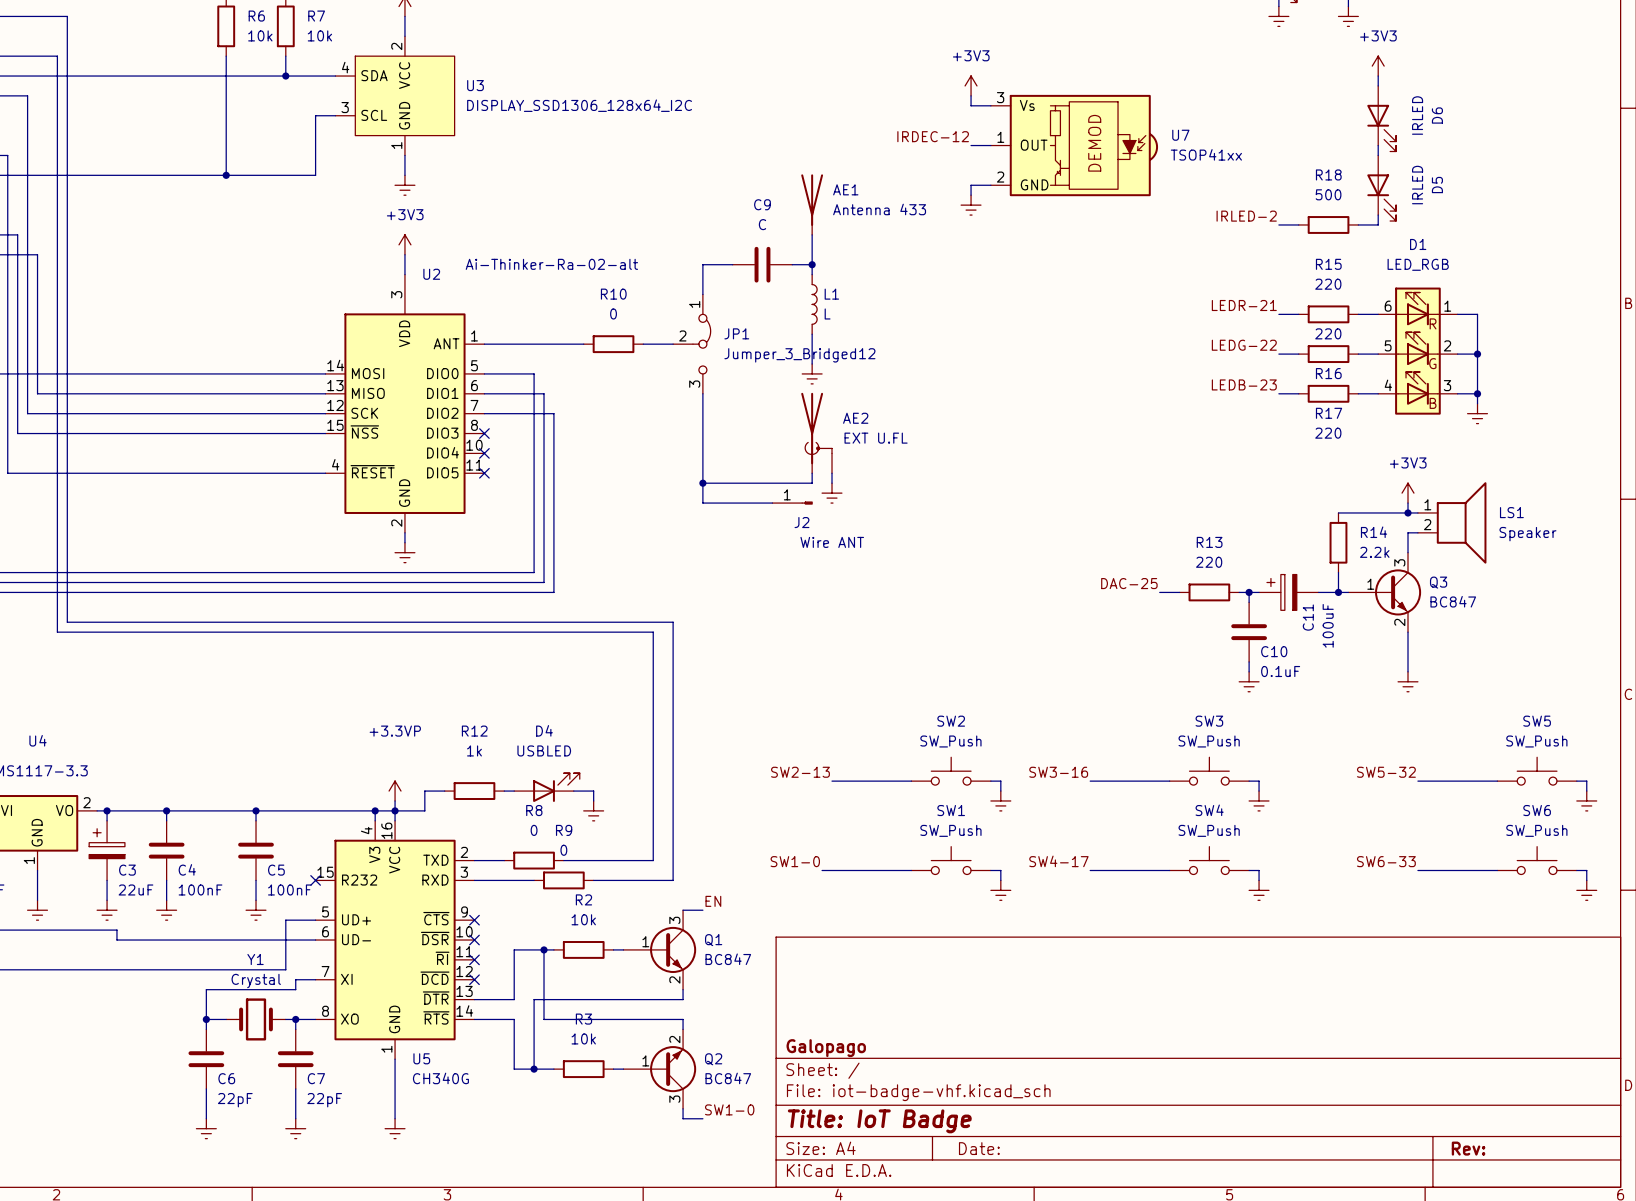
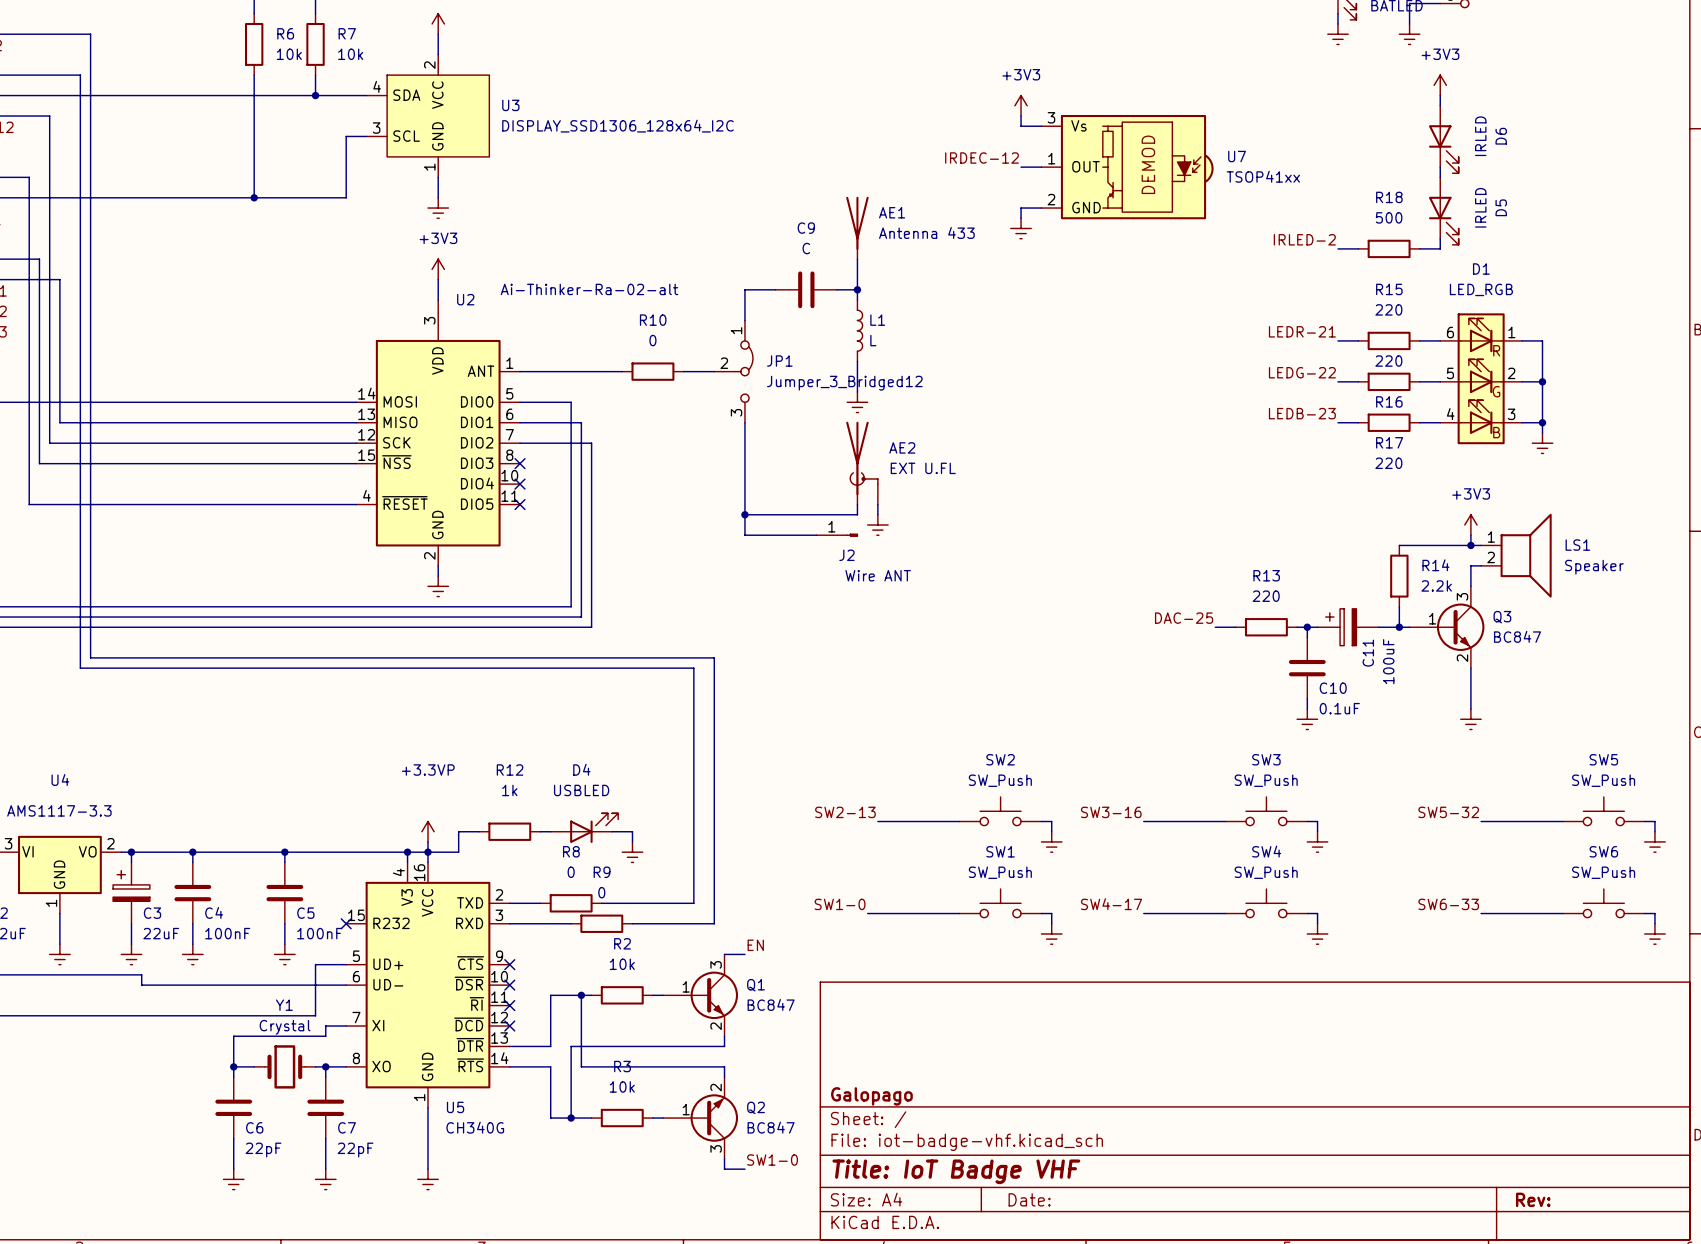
title block: Title: IoT Badge (879, 1121) -> Title: IoT Badge VHF (956, 1171)

